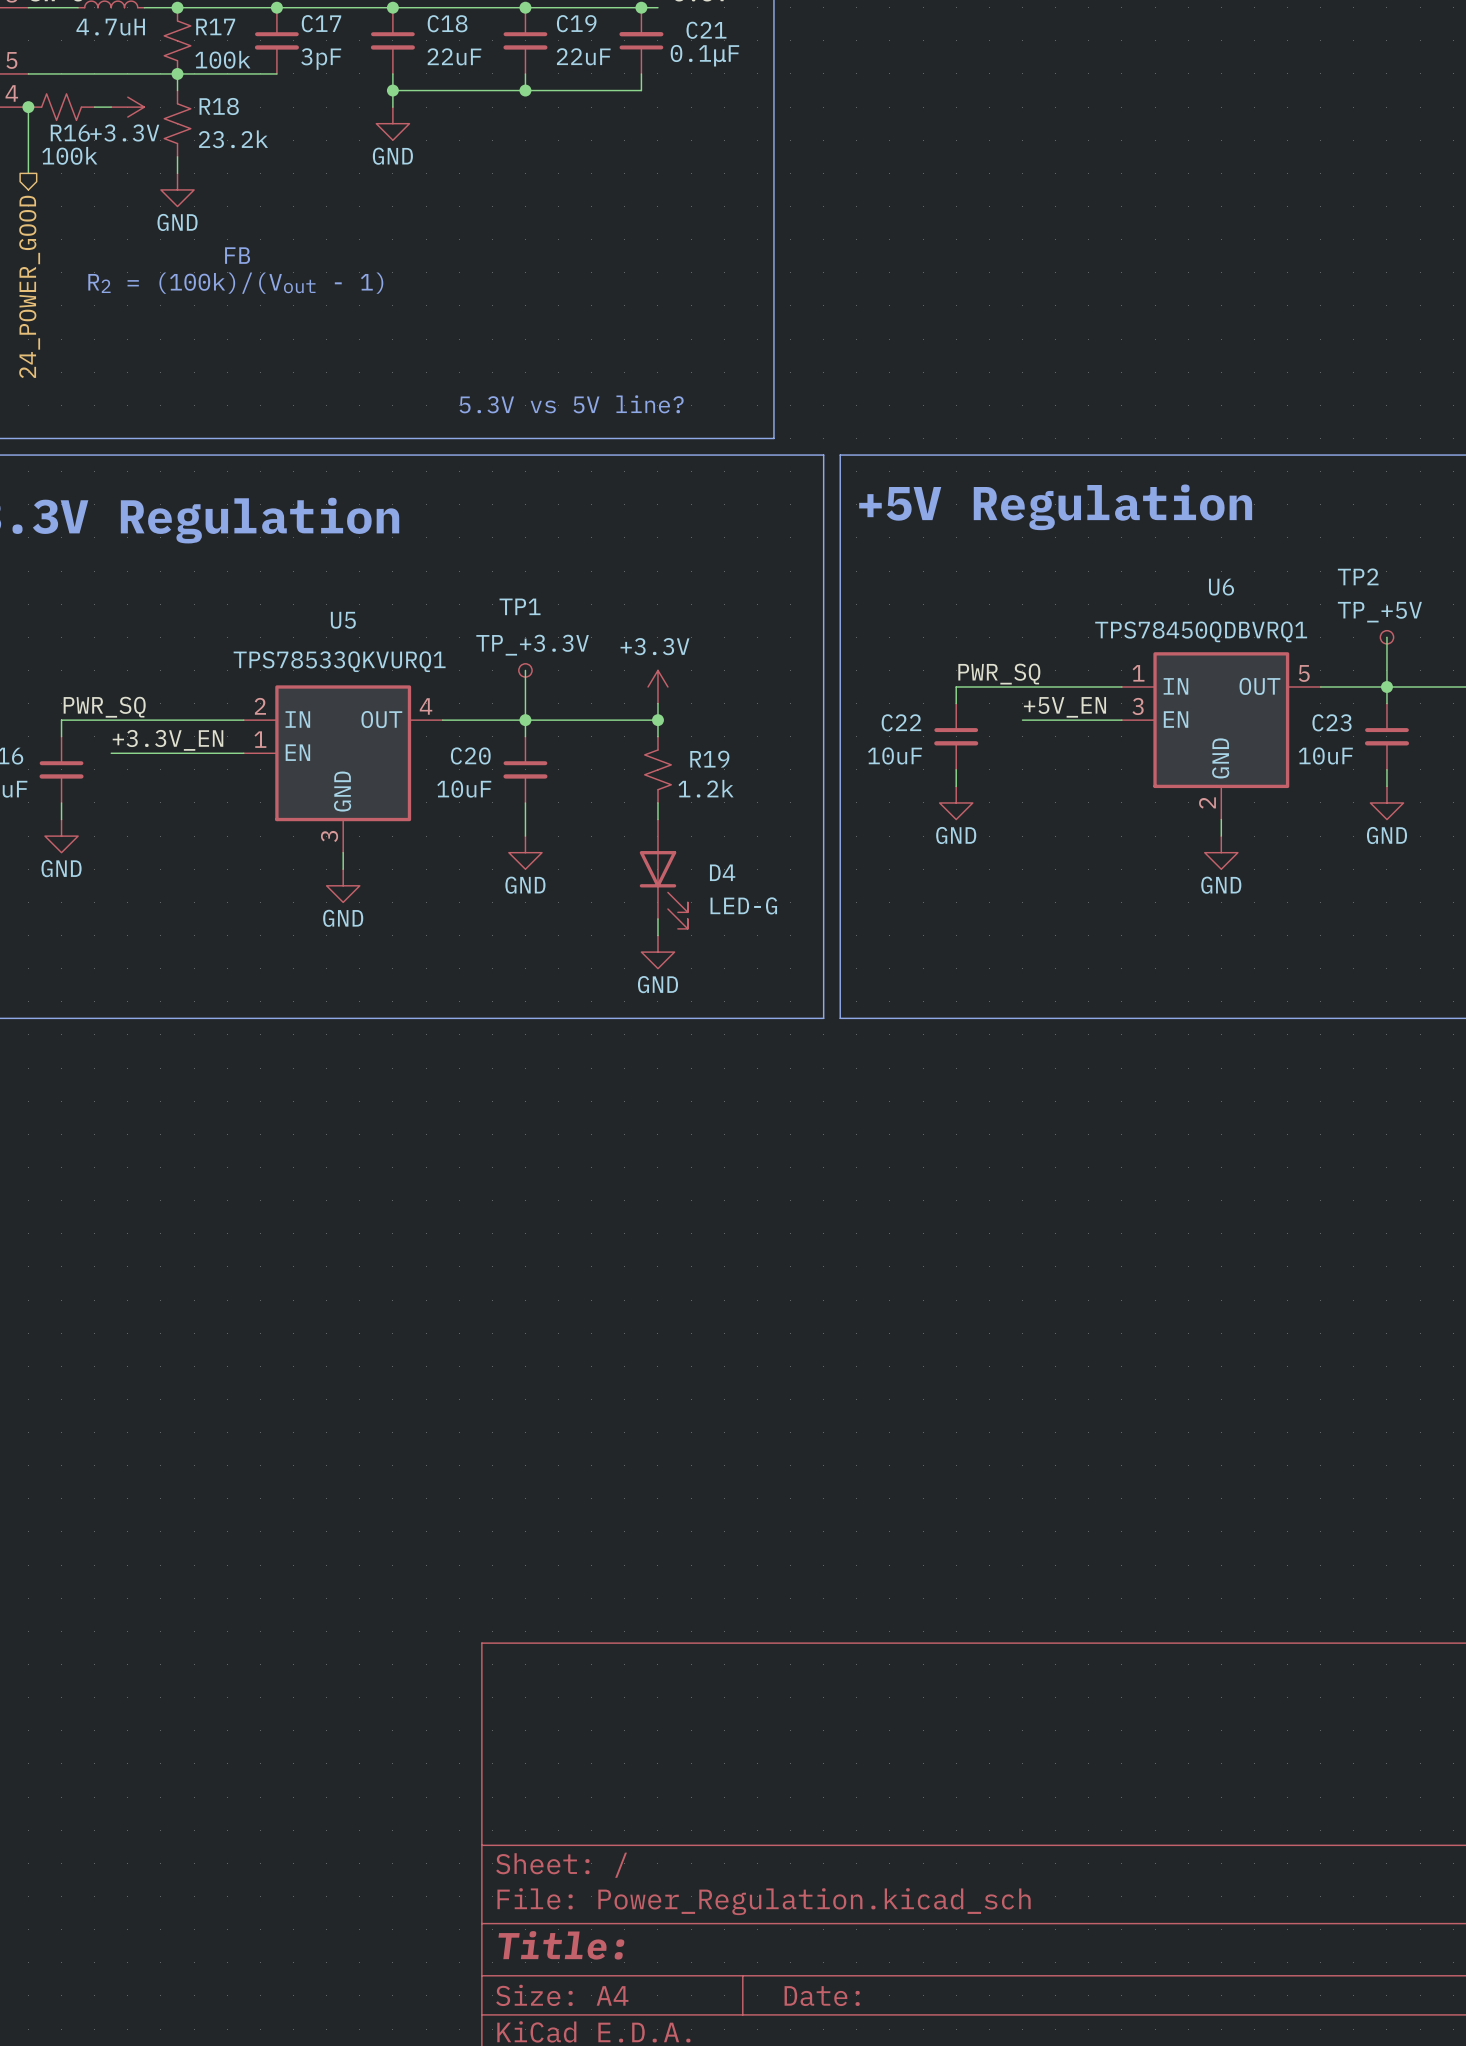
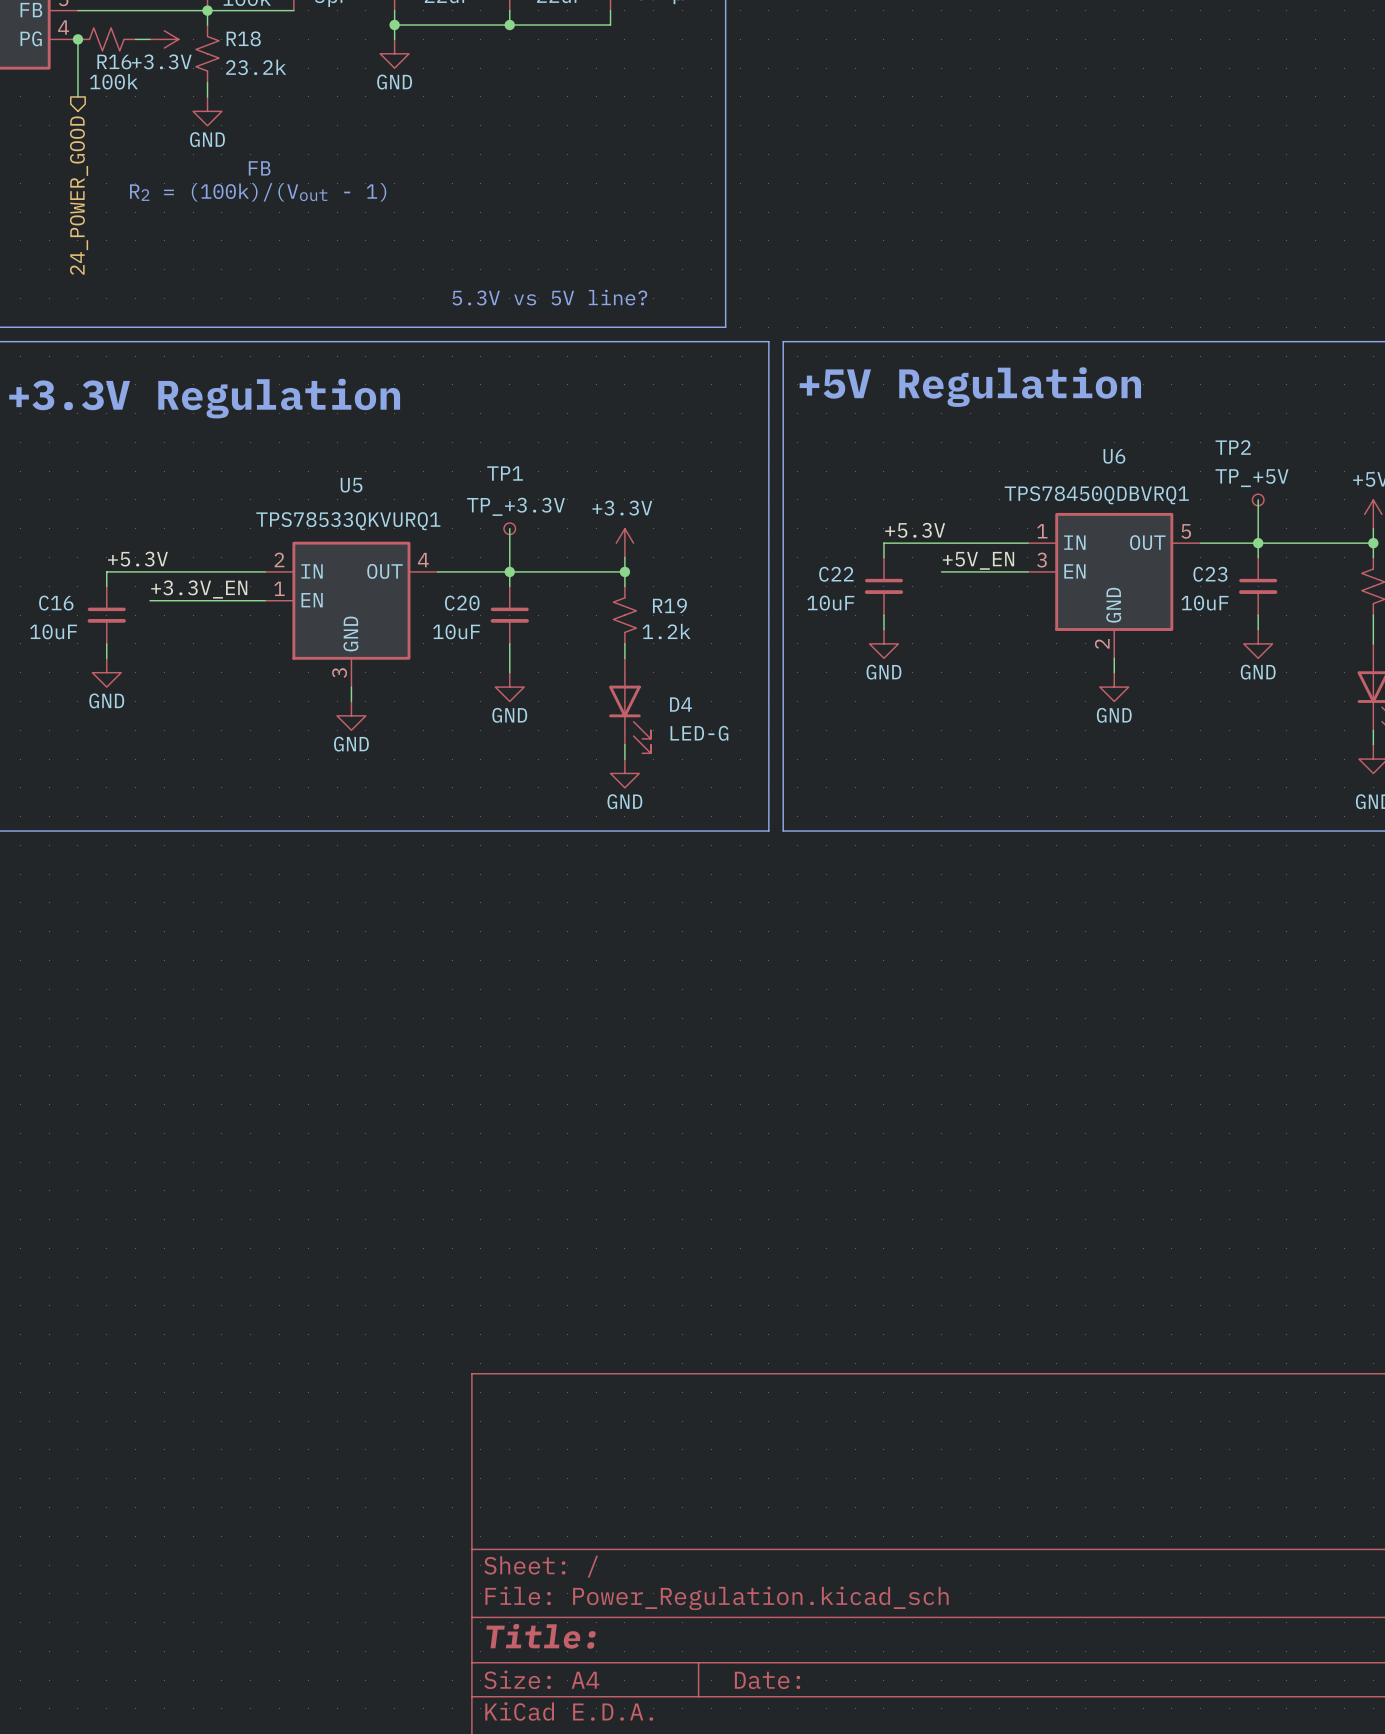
label: PWR_SQ (999, 674) -> +5.3V (915, 530)
label: PWR_SQ (104, 707) -> +5.3V (137, 559)

